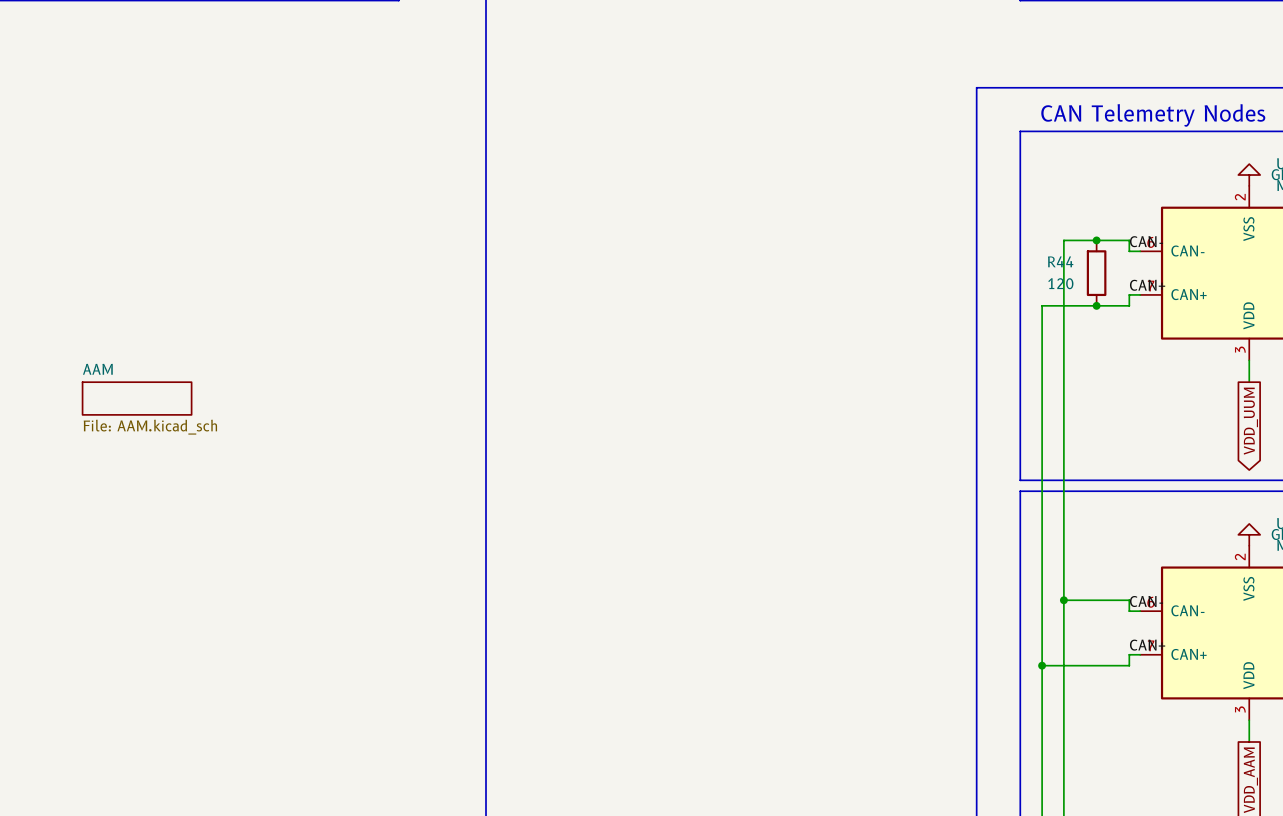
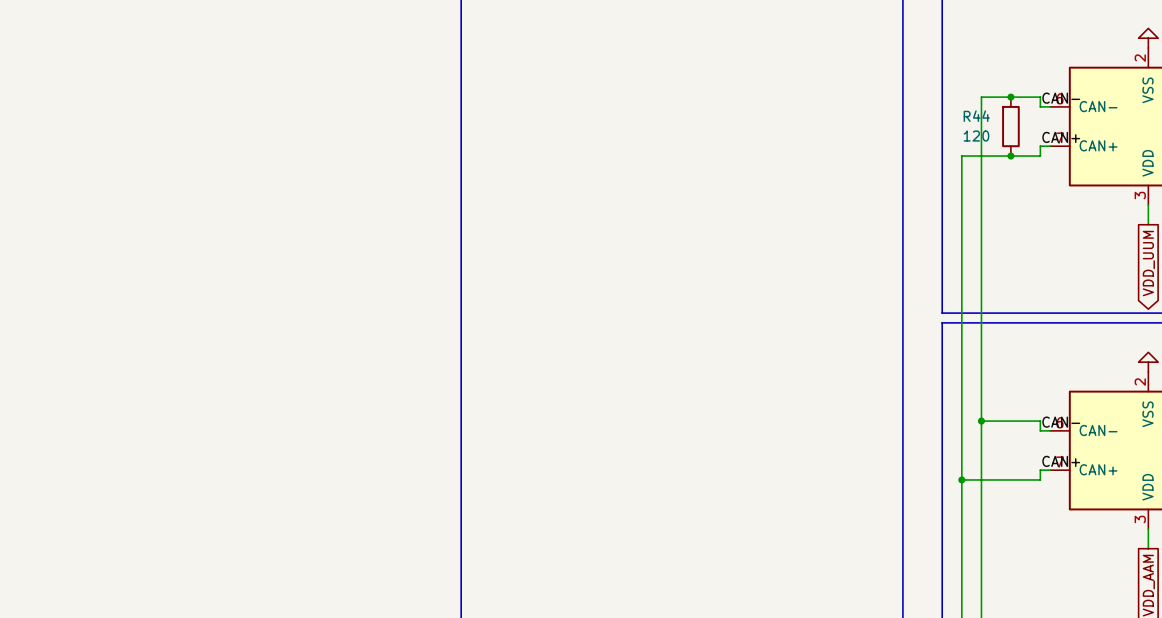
sheet AAM: File: AAM.kicad_sch (137, 398) -> none

